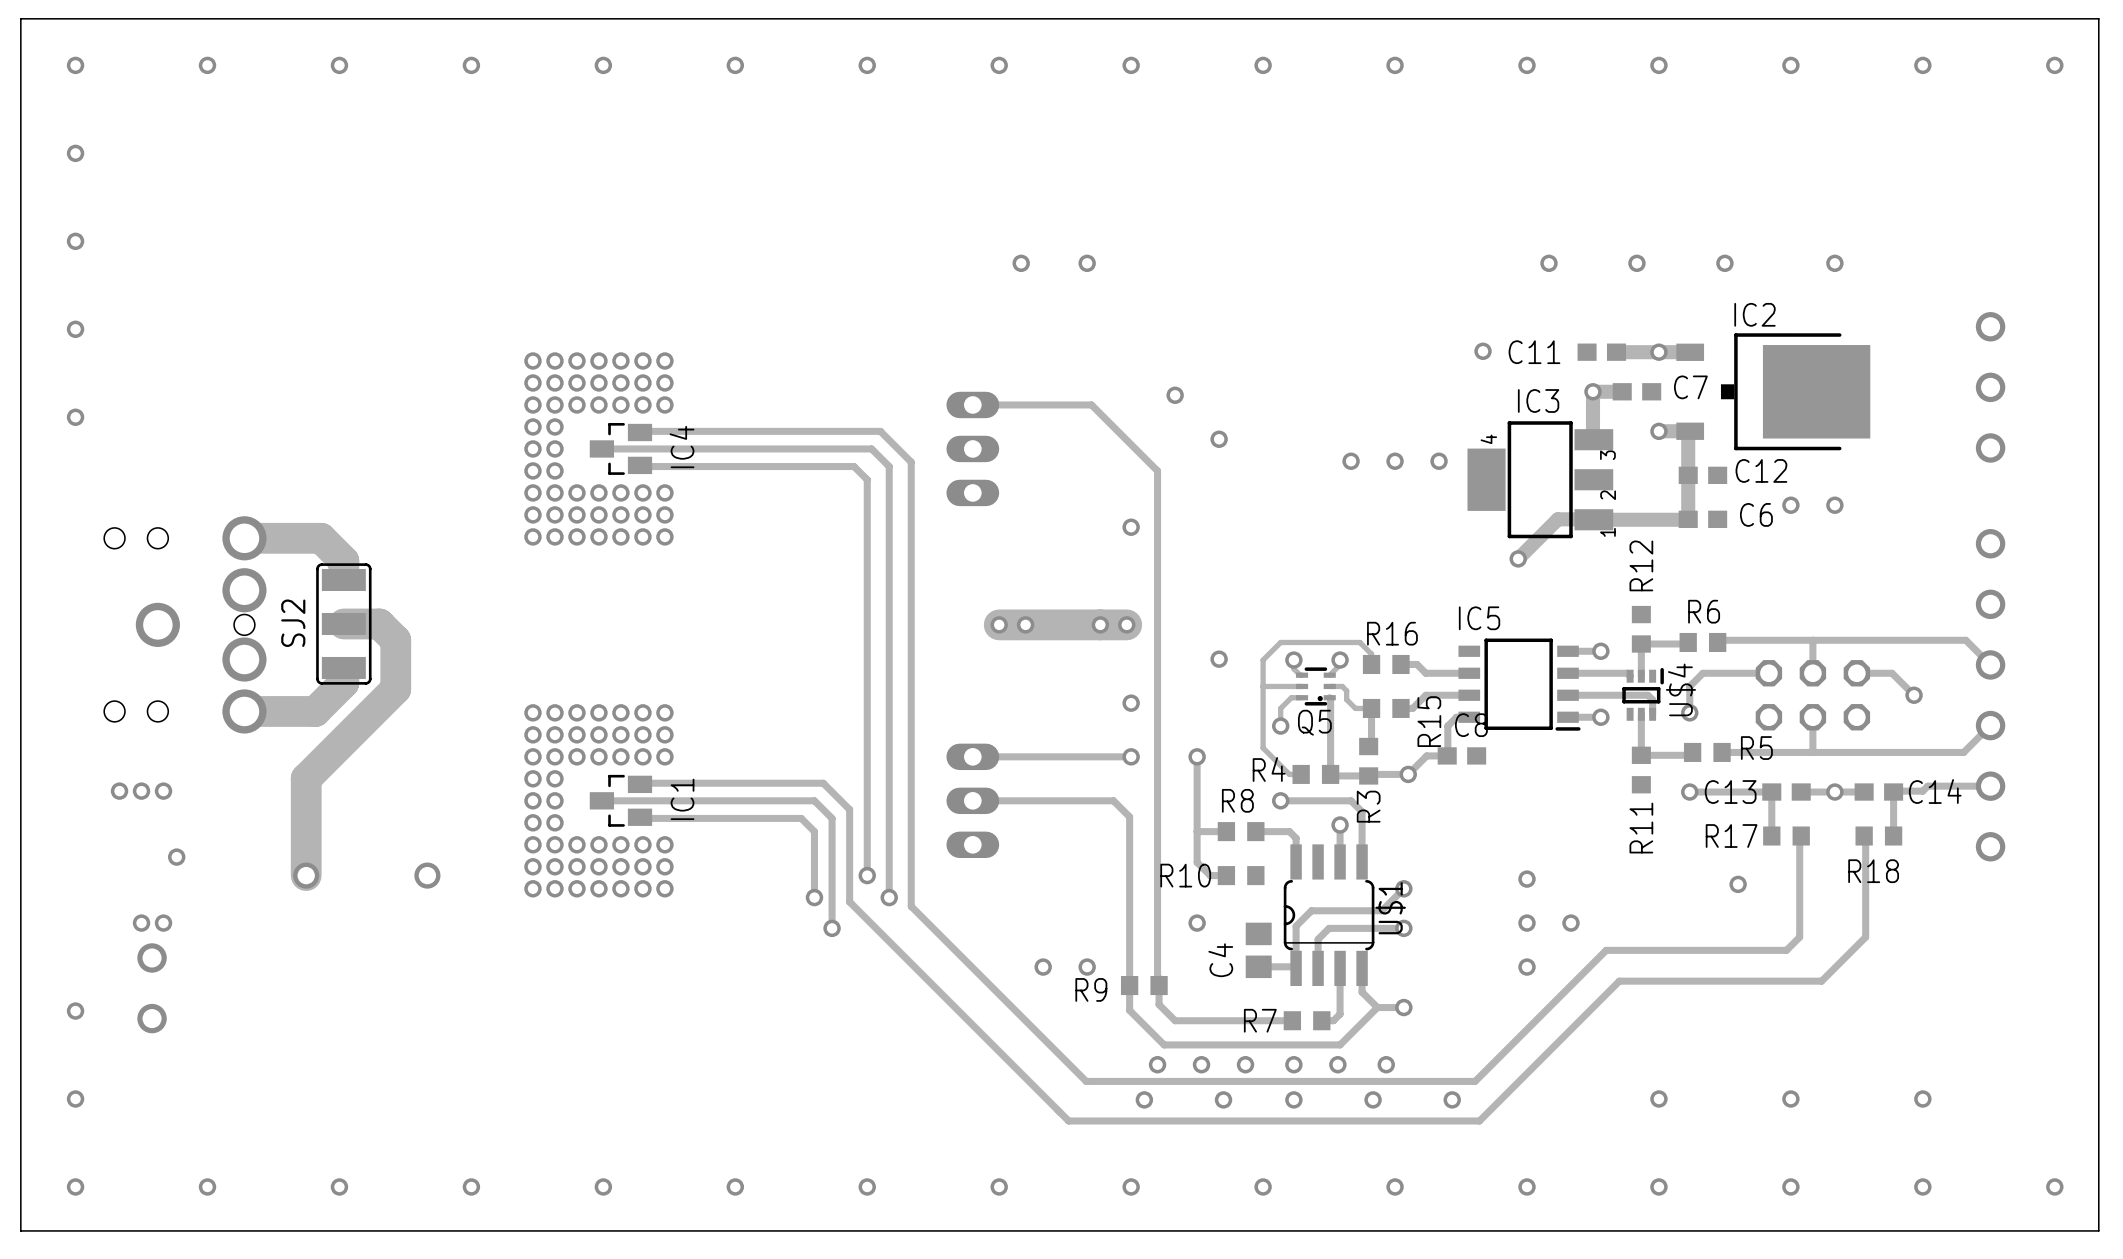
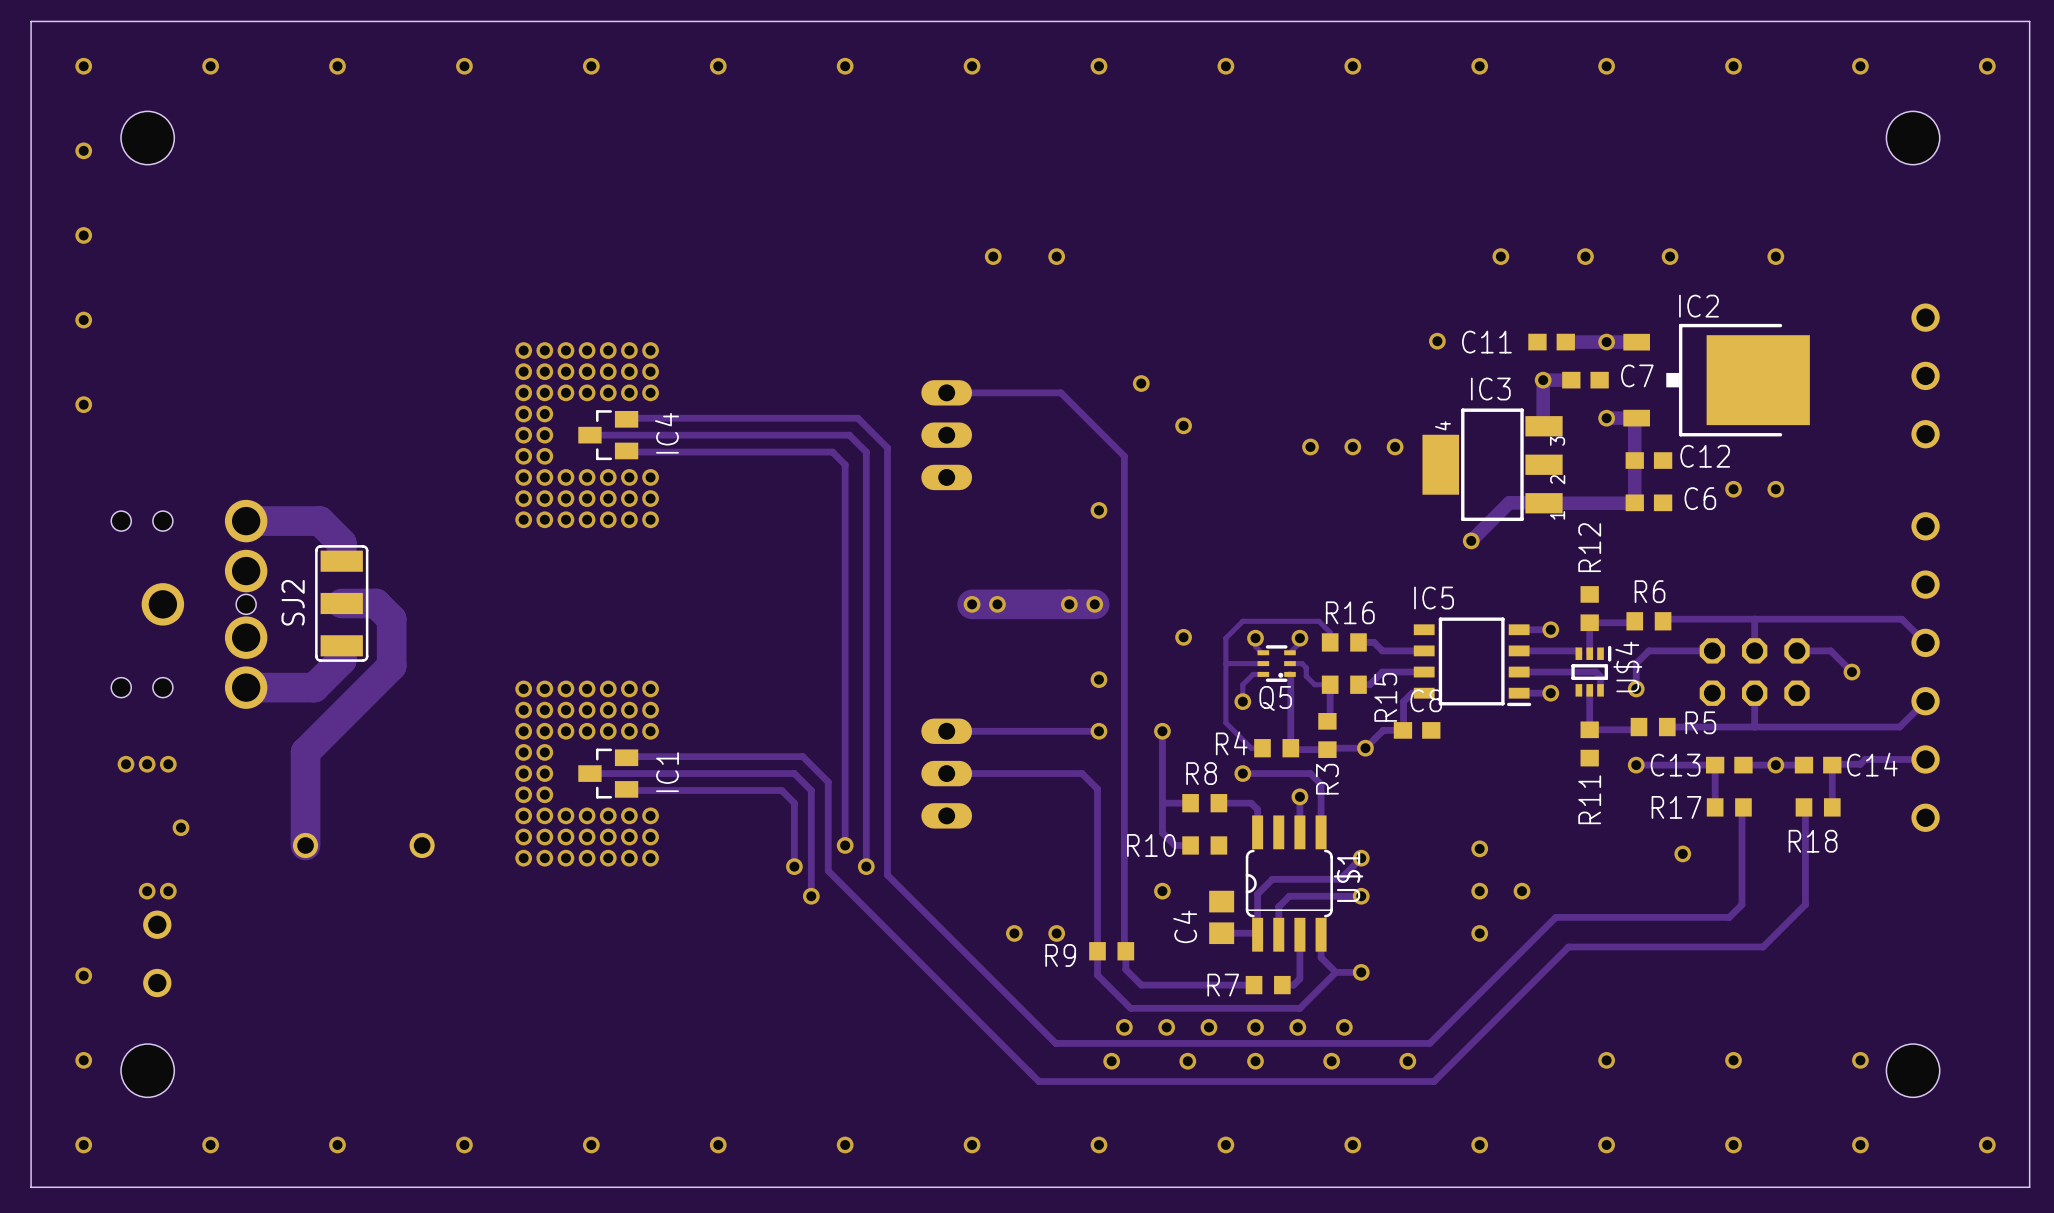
hole: none -> (147, 138)
hole: none -> (1913, 138)
hole: none -> (147, 1070)
hole: none -> (1913, 1070)

